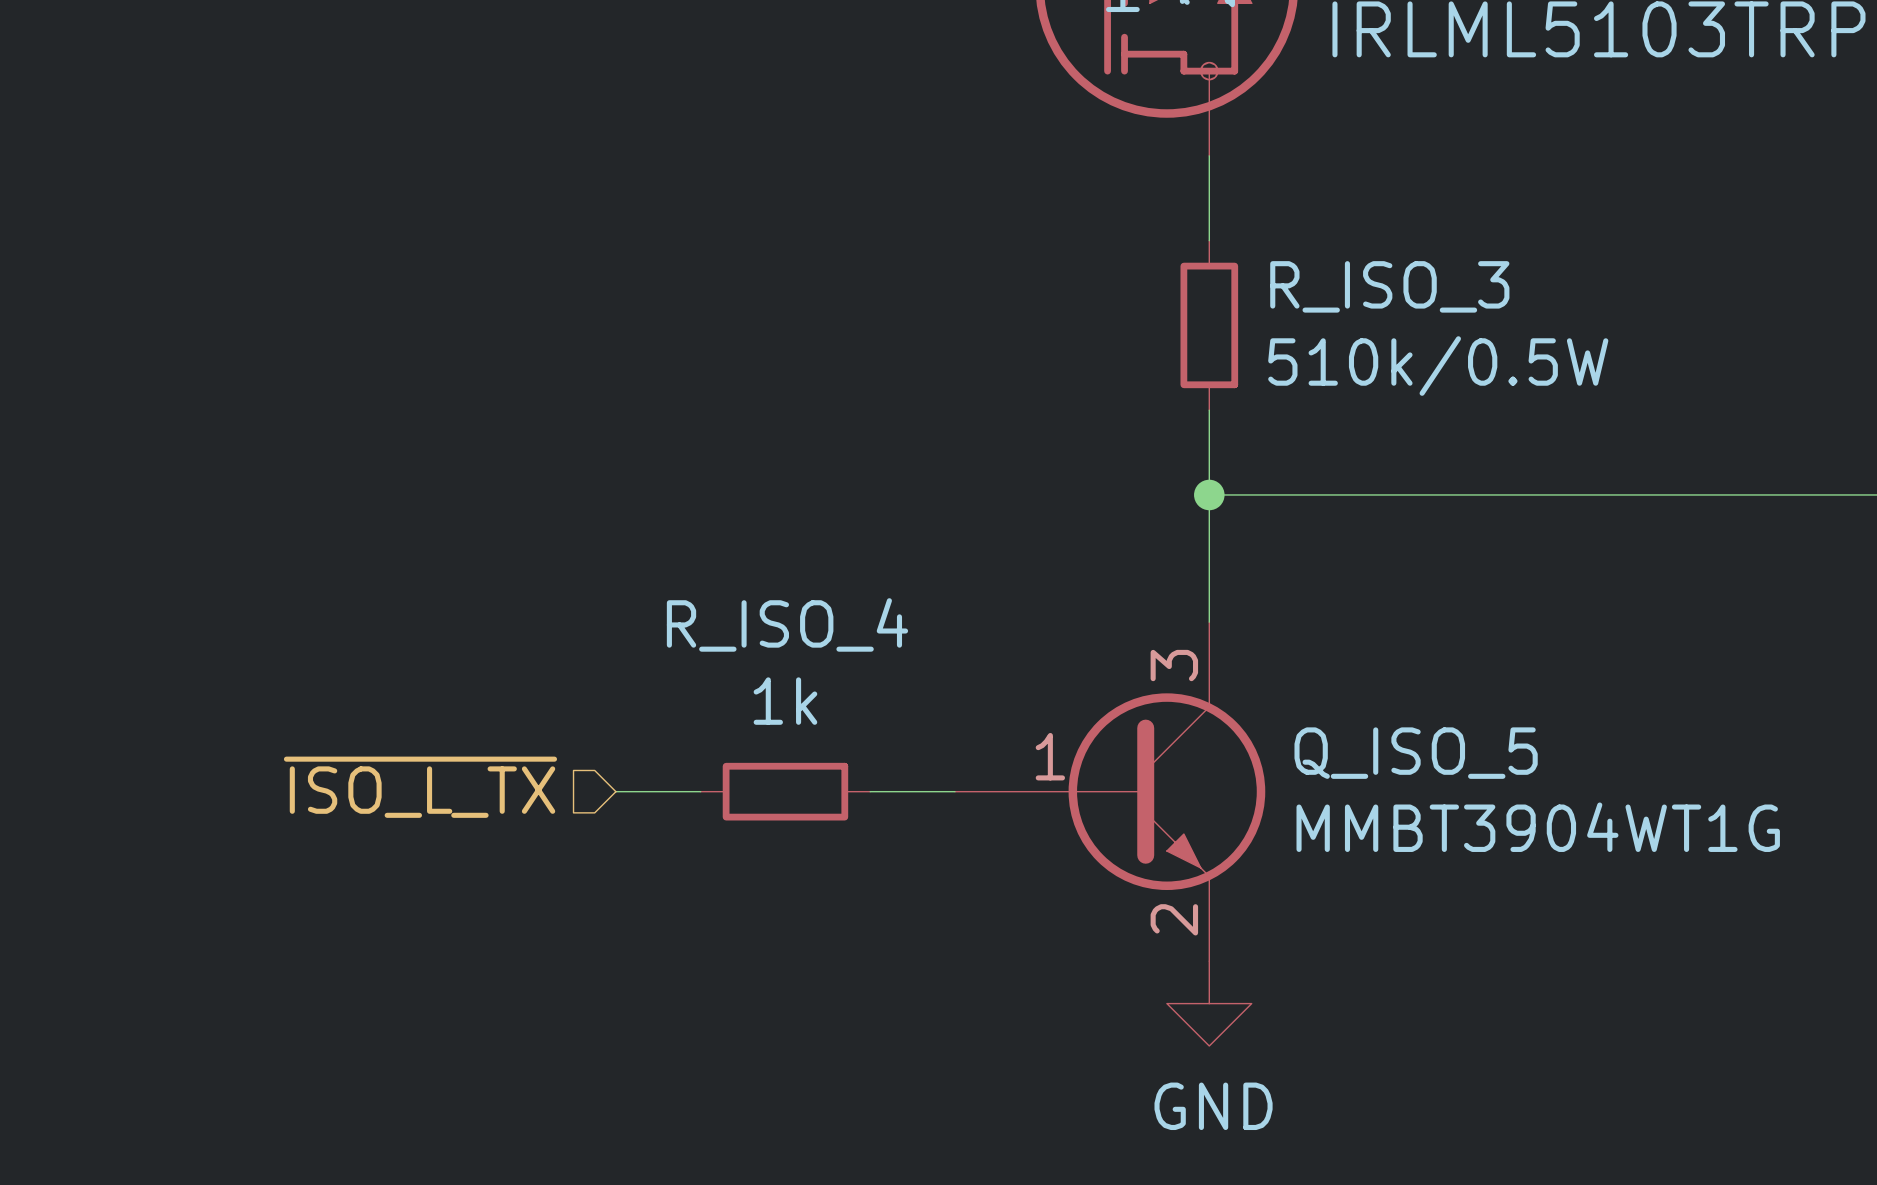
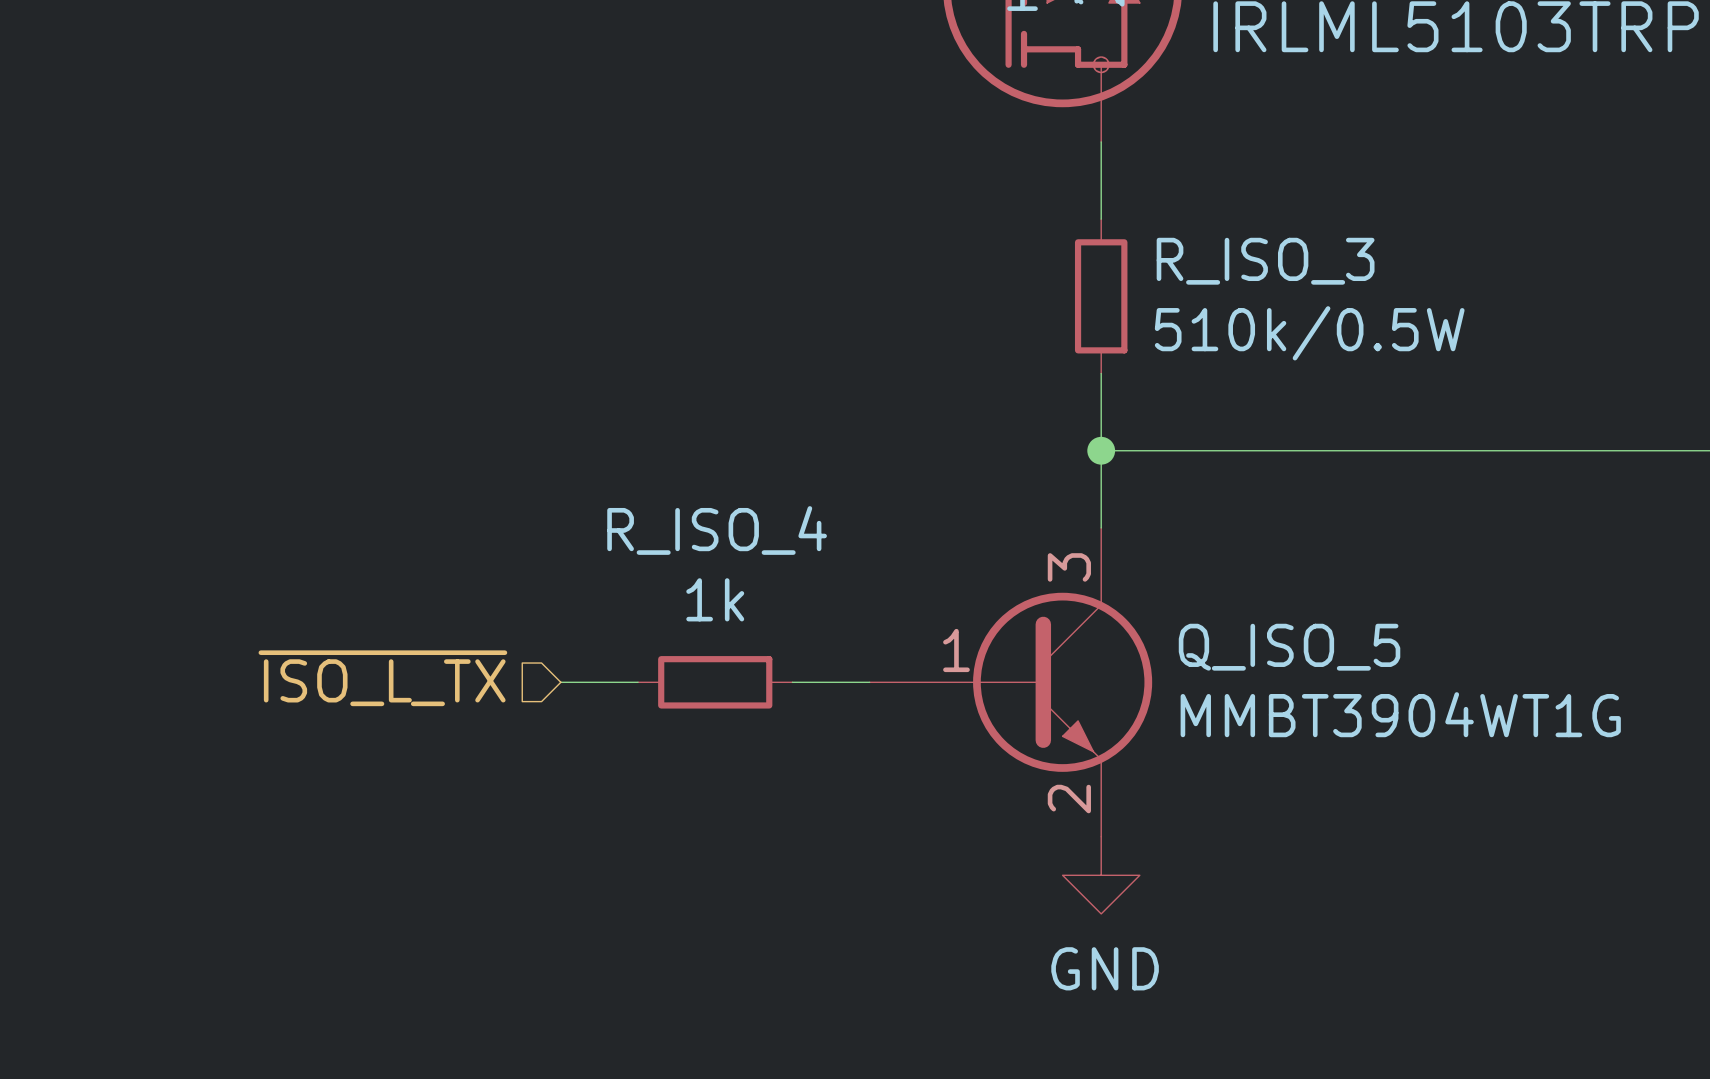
hierarchical label position: ~{ISO_L_TX} (420, 787) -> ~{ISO_L_TX} (382, 678)
wire: (615, 791) (700, 791) -> (560, 682) (638, 682)
R_ISO_4 position: (785, 791) -> (715, 682)
wire: (870, 791) (954, 791) -> (792, 682) (869, 682)
Q_ISO_5 position: (1110, 791) -> (1010, 682)
power symbol position: GND (1209, 1003) -> GND (1101, 875)

